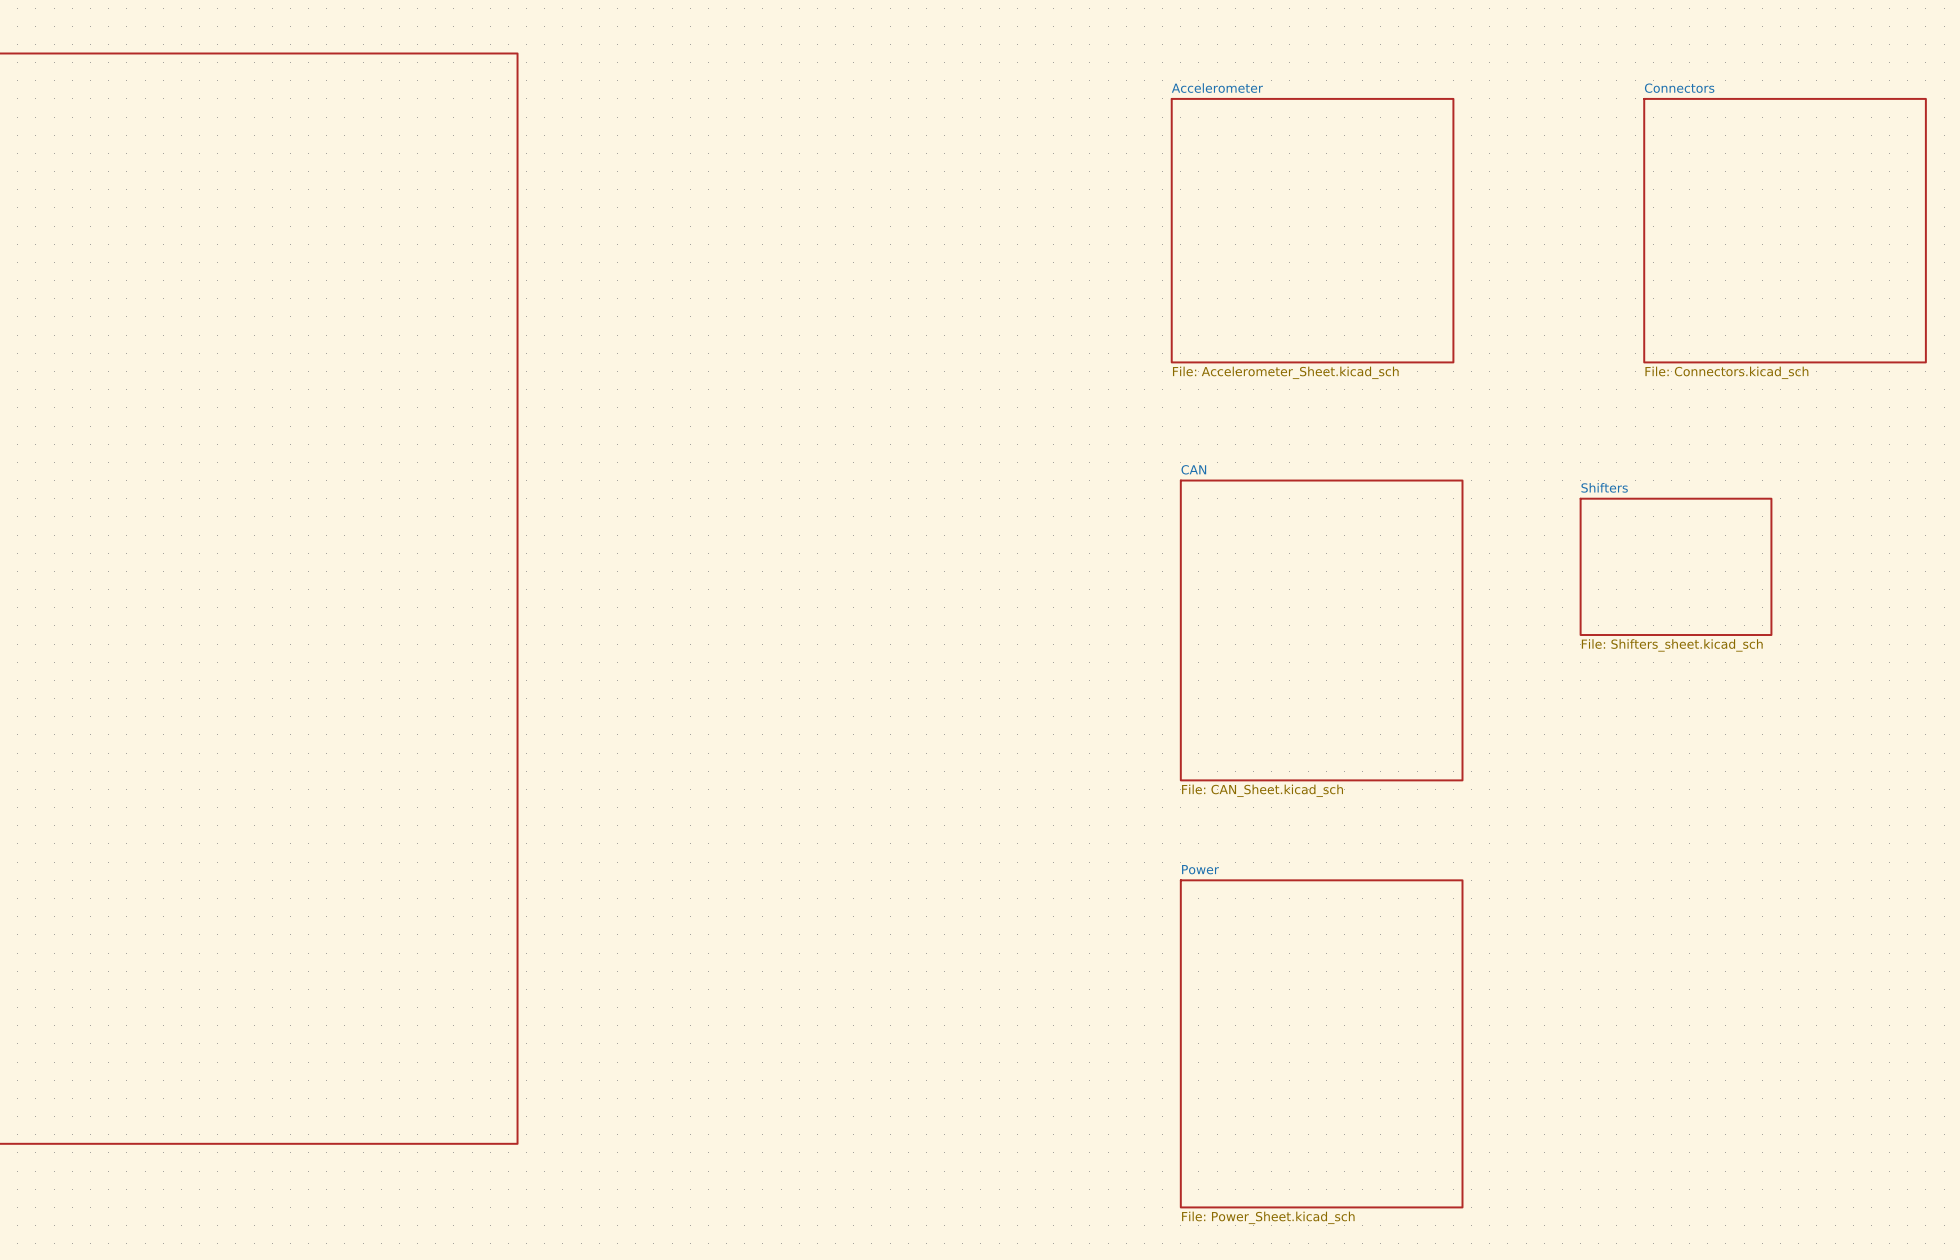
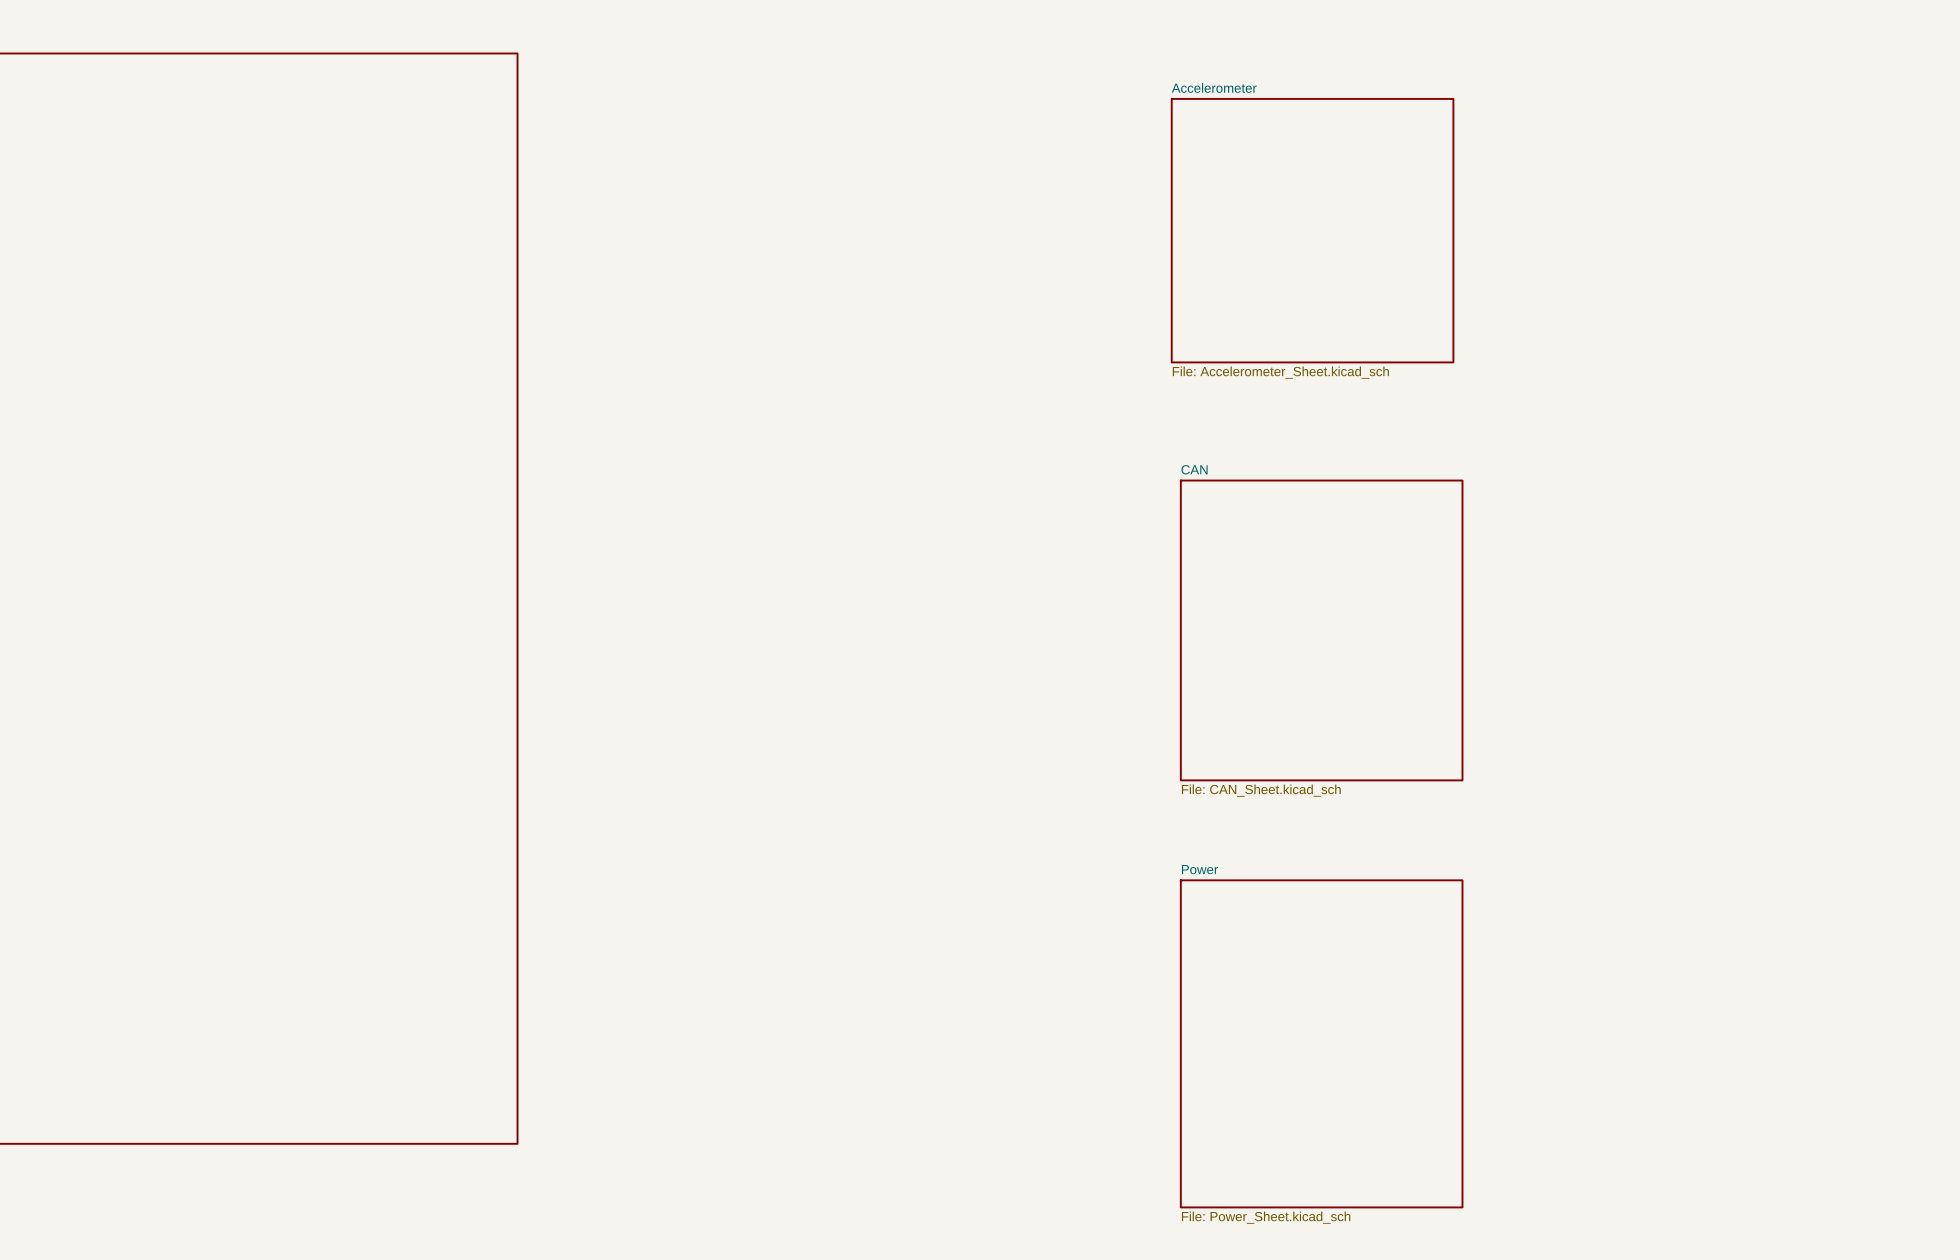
sheet Connectors: File: Connectors.kicad_sch (1785, 230) -> none
sheet Shifters: File: Shifters_sheet.kicad_sch (1676, 566) -> none

